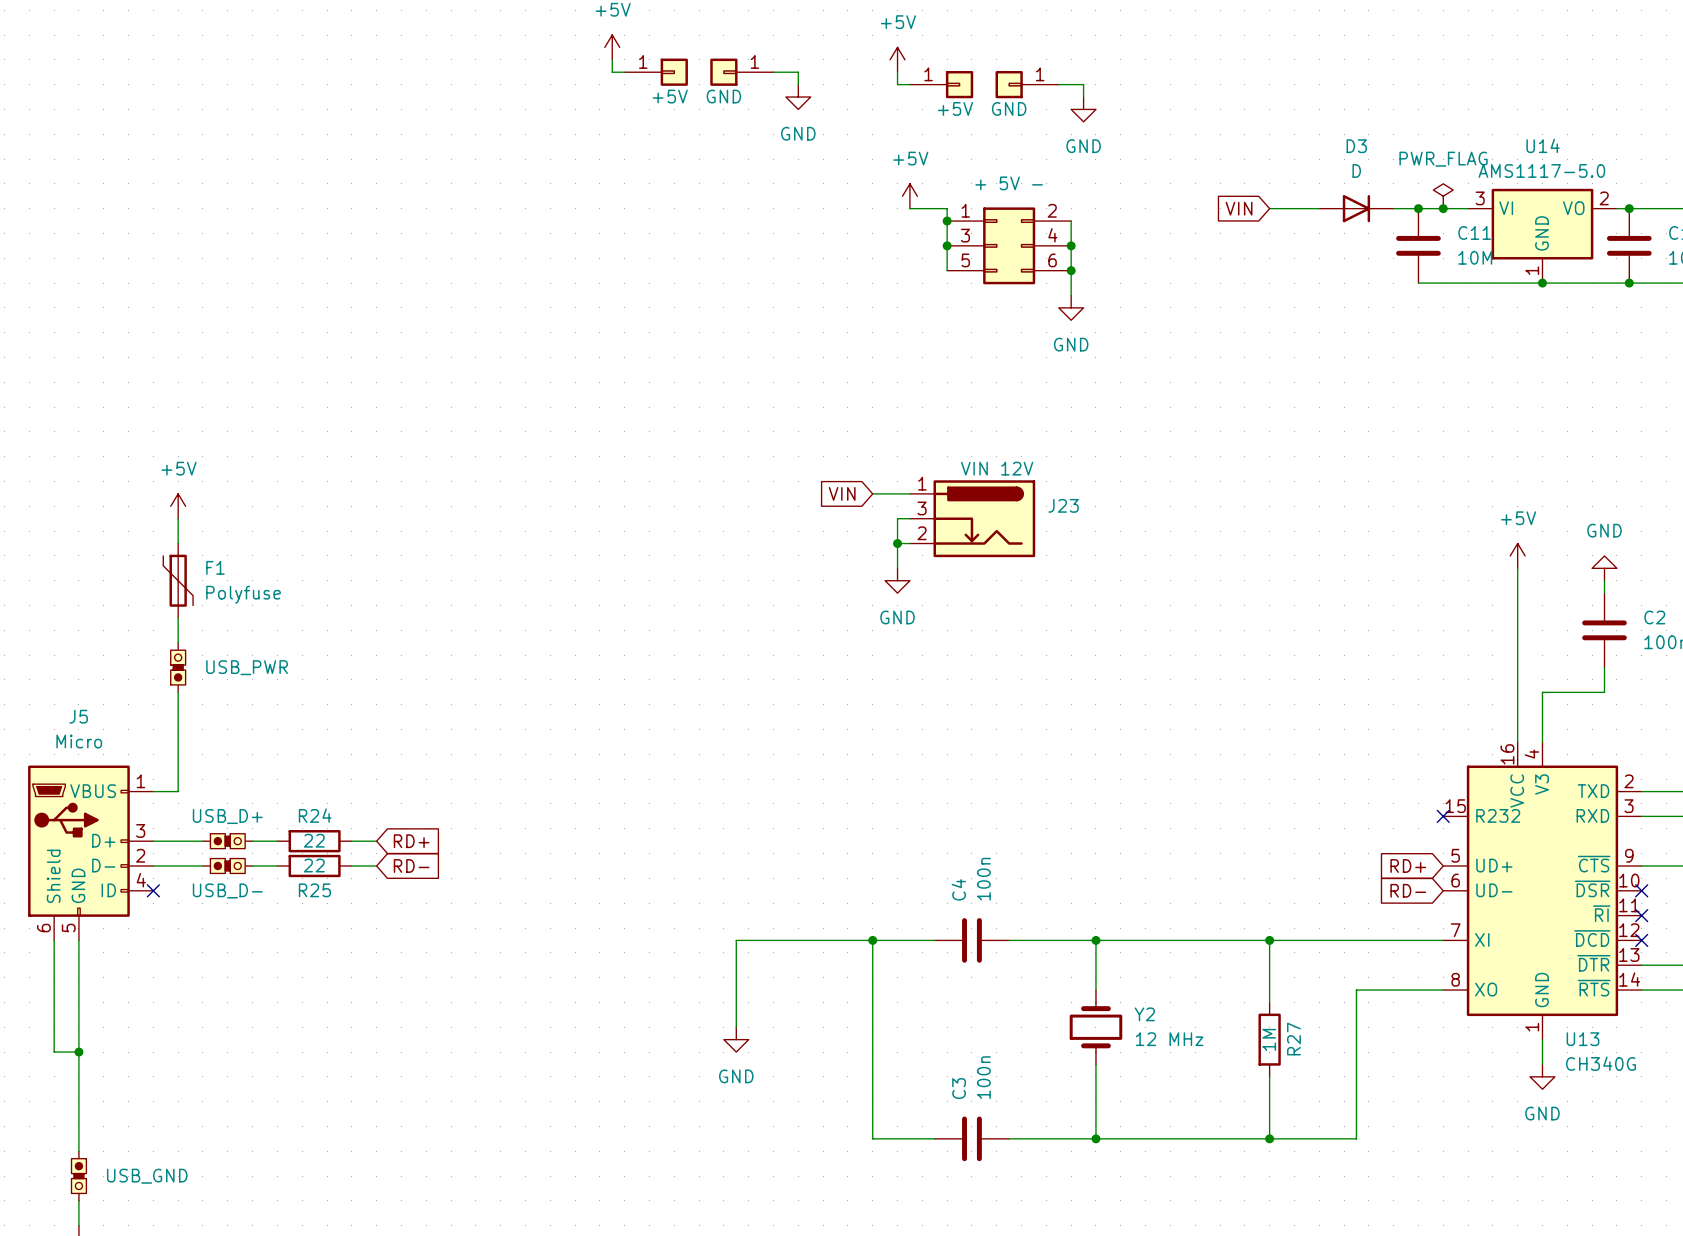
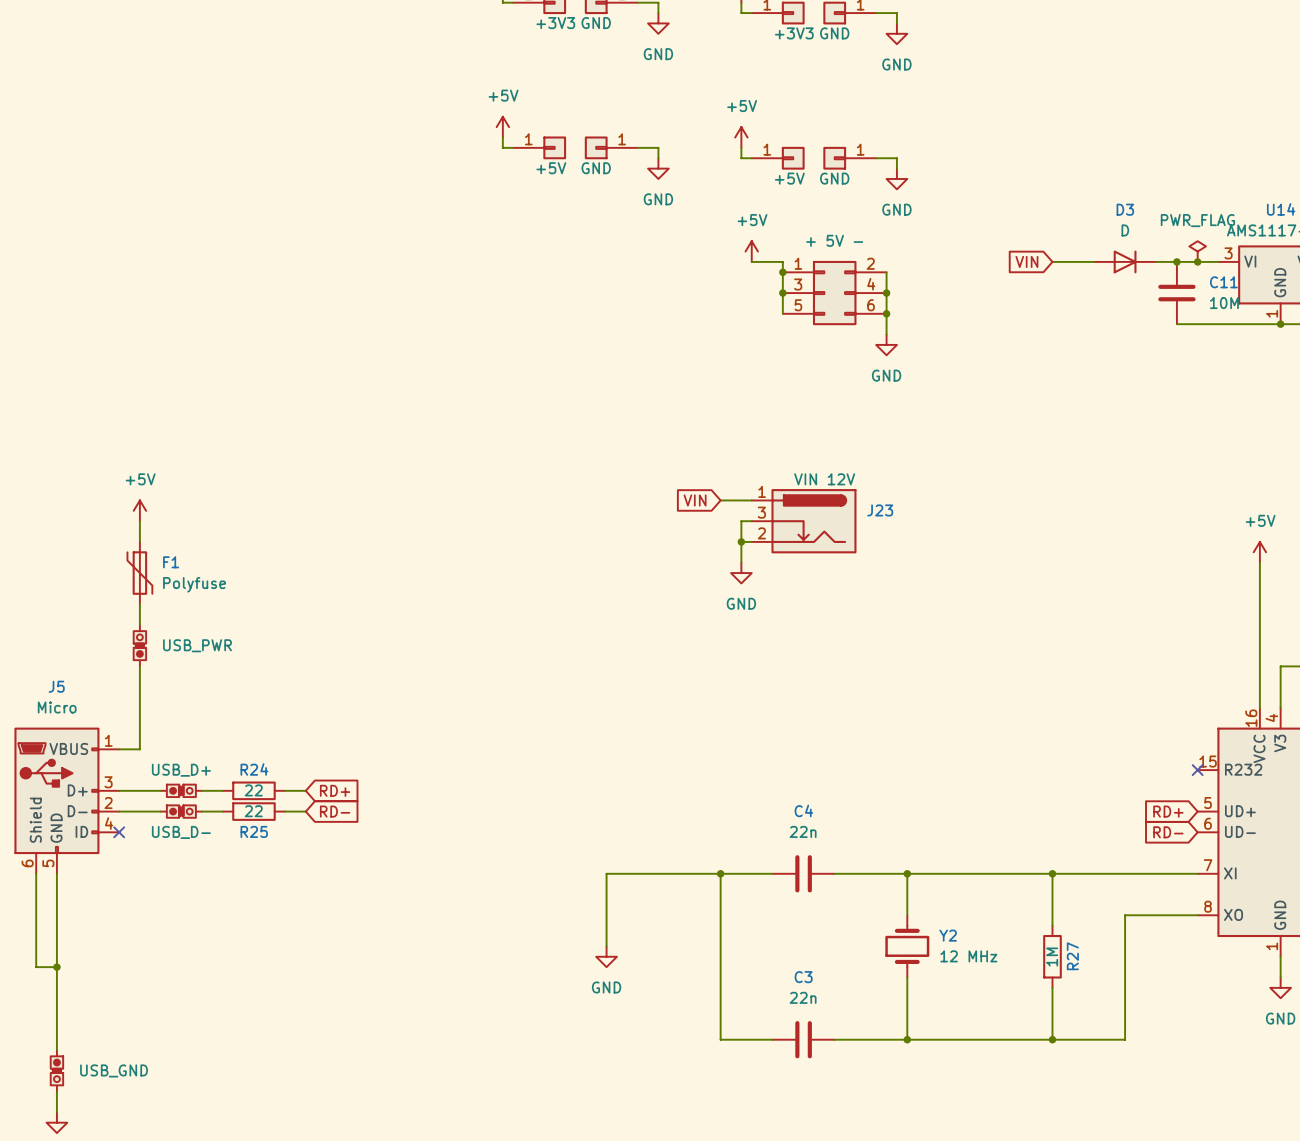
C4 value: 100n (983, 879) -> 22n (803, 831)
C4 name rotation: 0° (958, 889) -> 90° clockwise (803, 810)
C3 value: 100n (983, 1077) -> 22n (803, 997)
C3 name rotation: 0° (959, 1088) -> 90° clockwise (803, 977)

